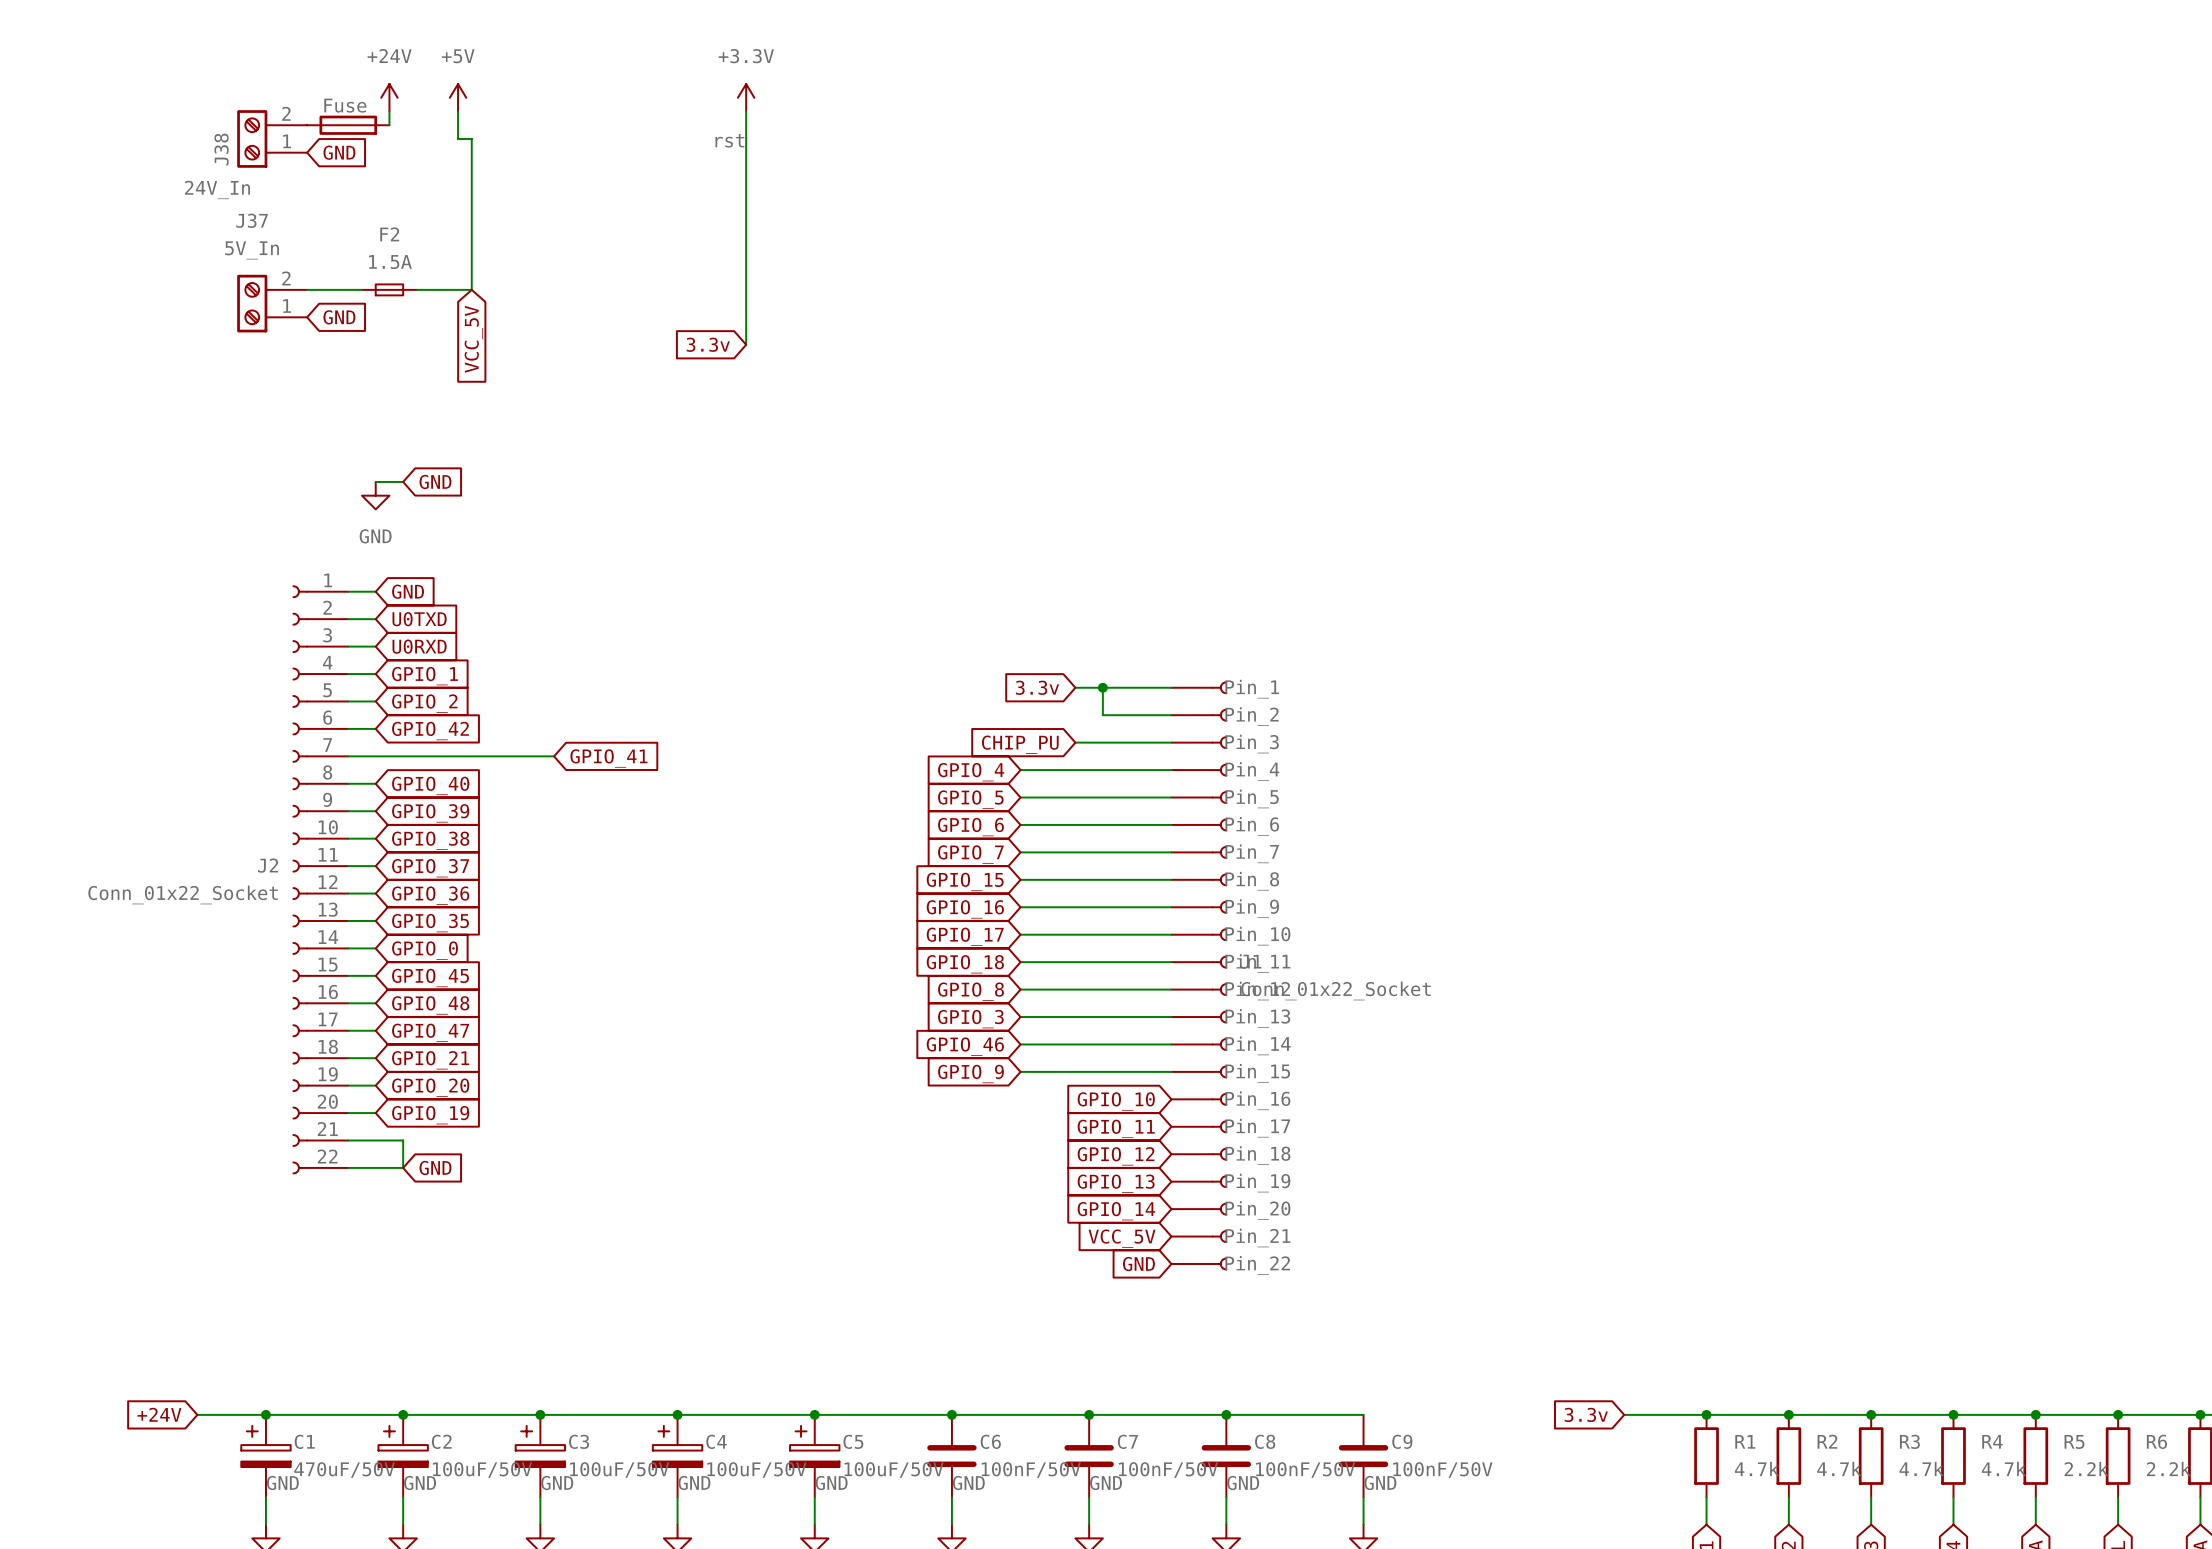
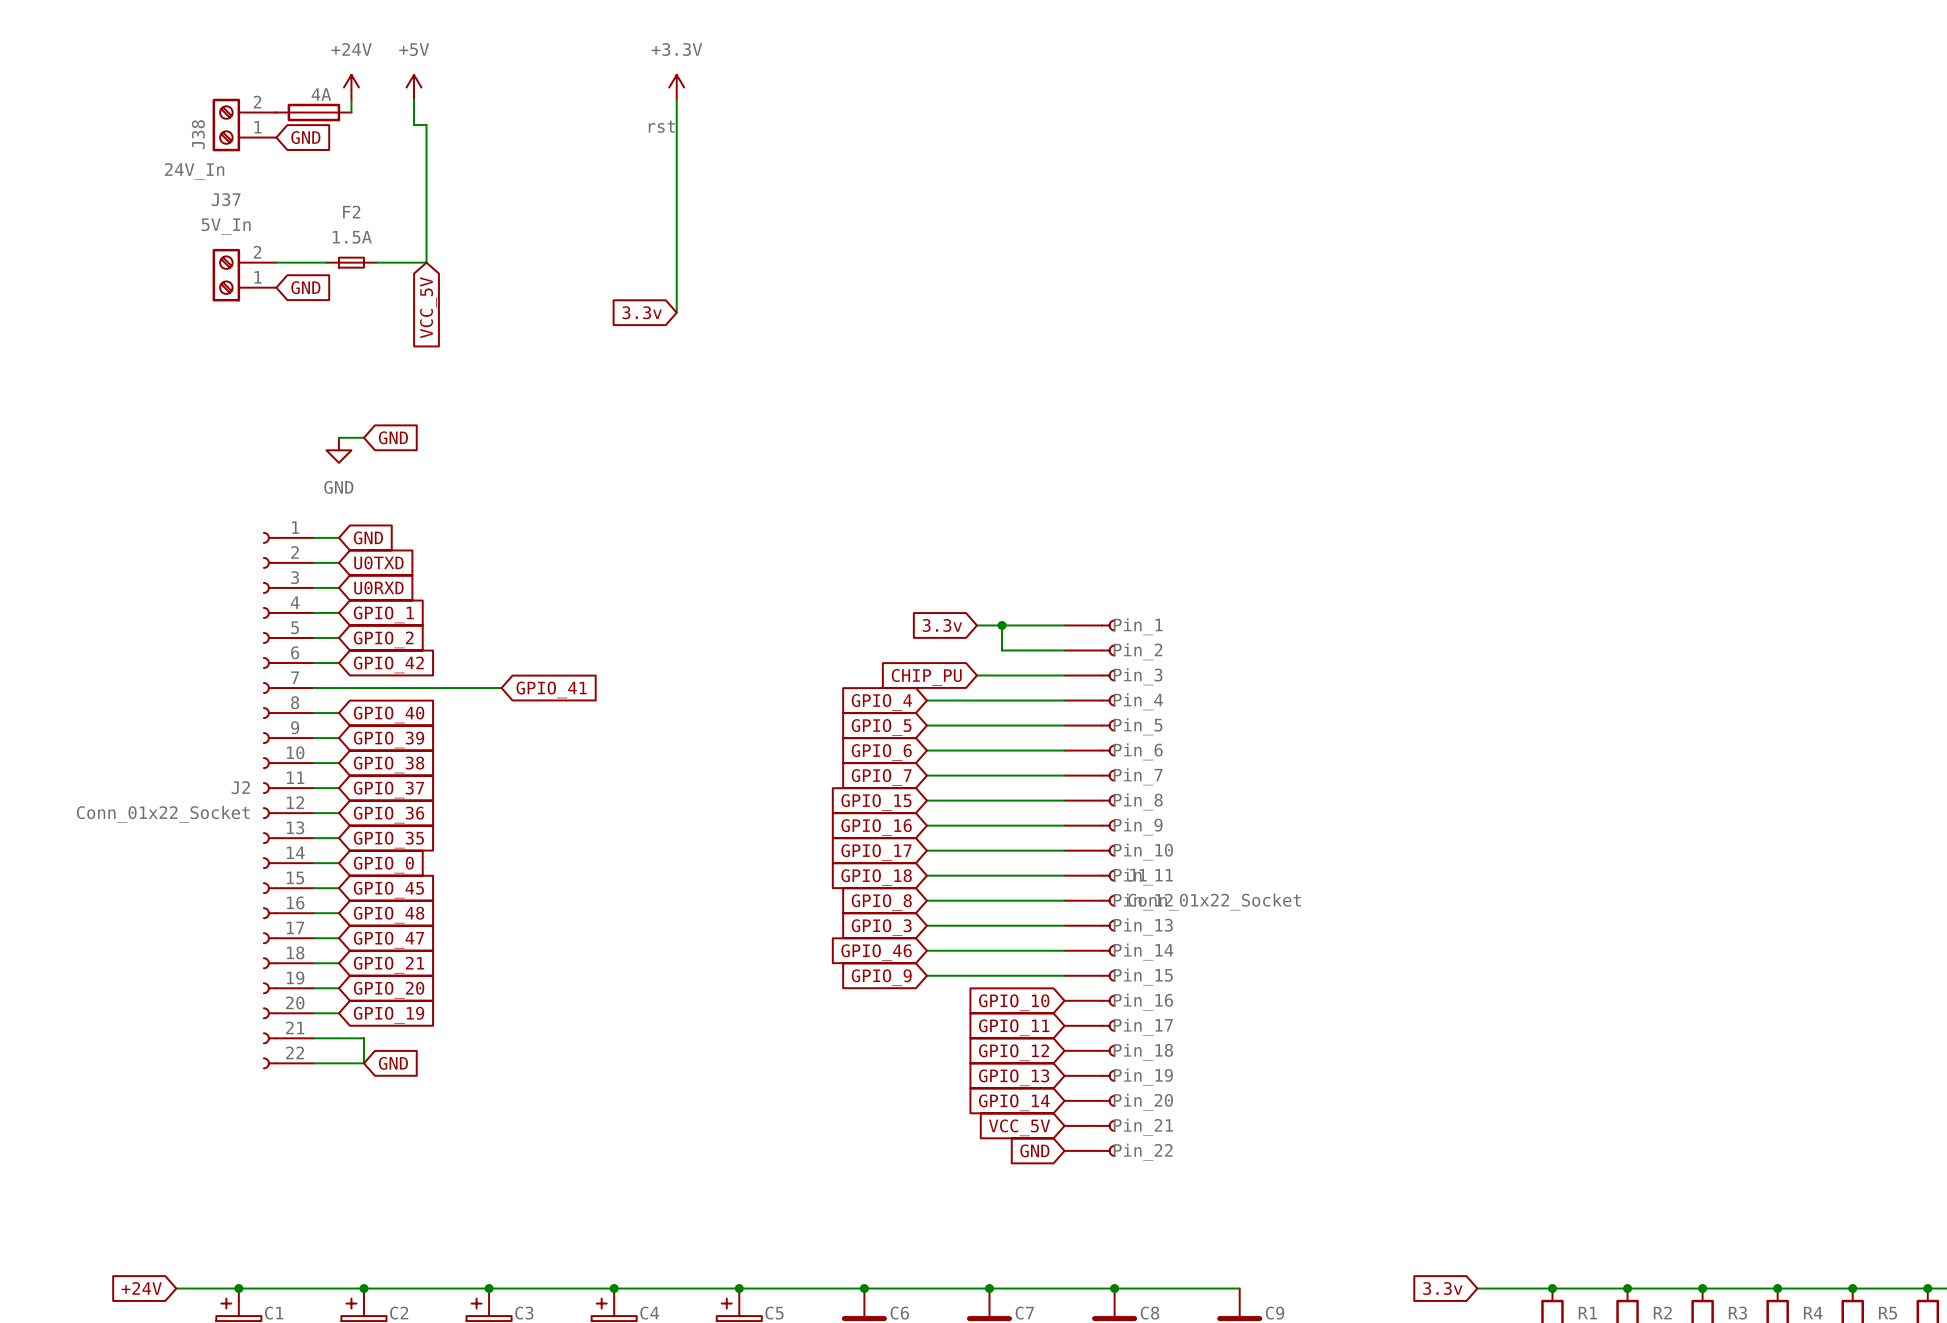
part value: Fuse (345, 105) -> 4A (321, 94)

